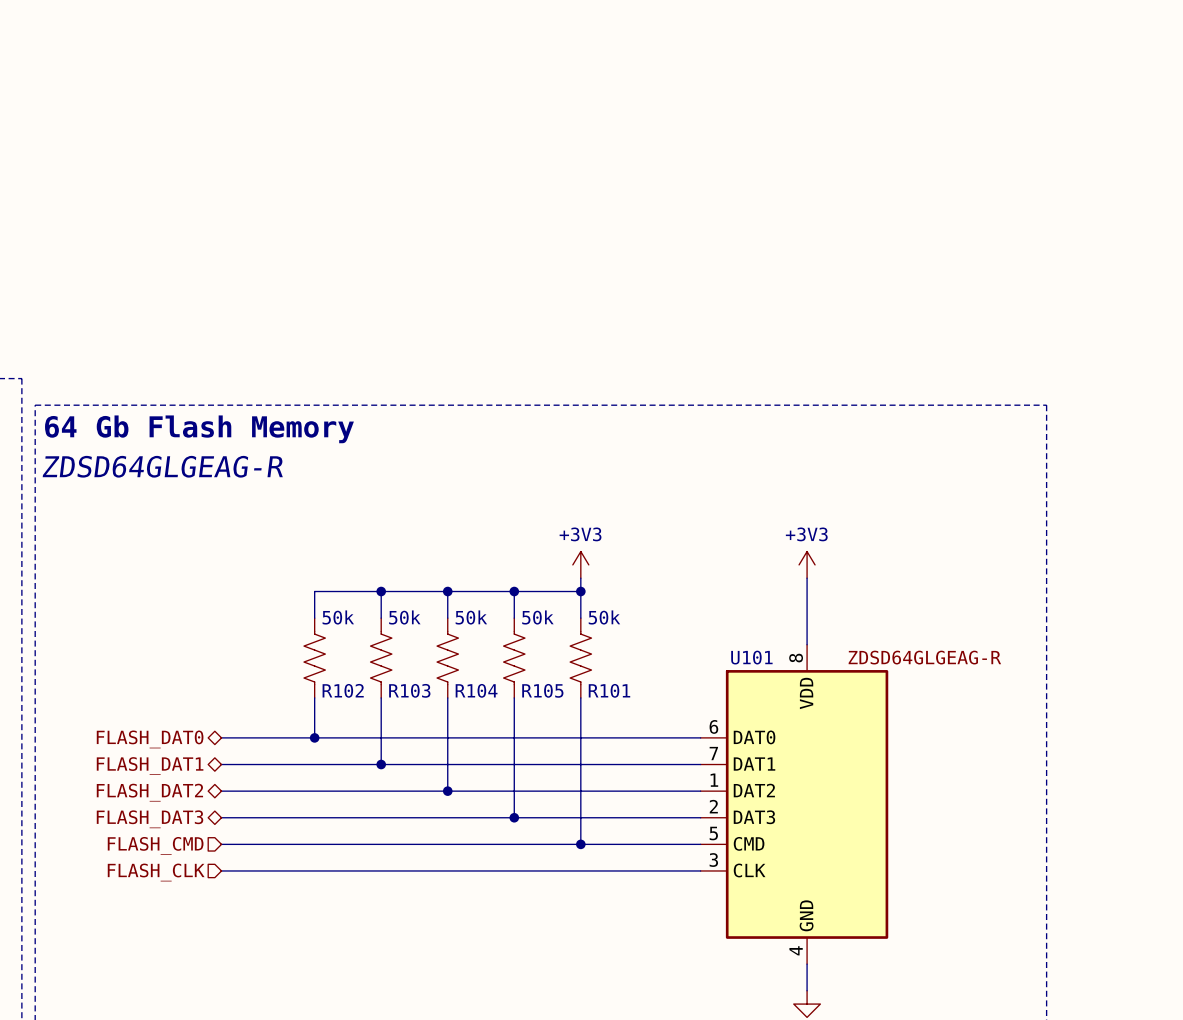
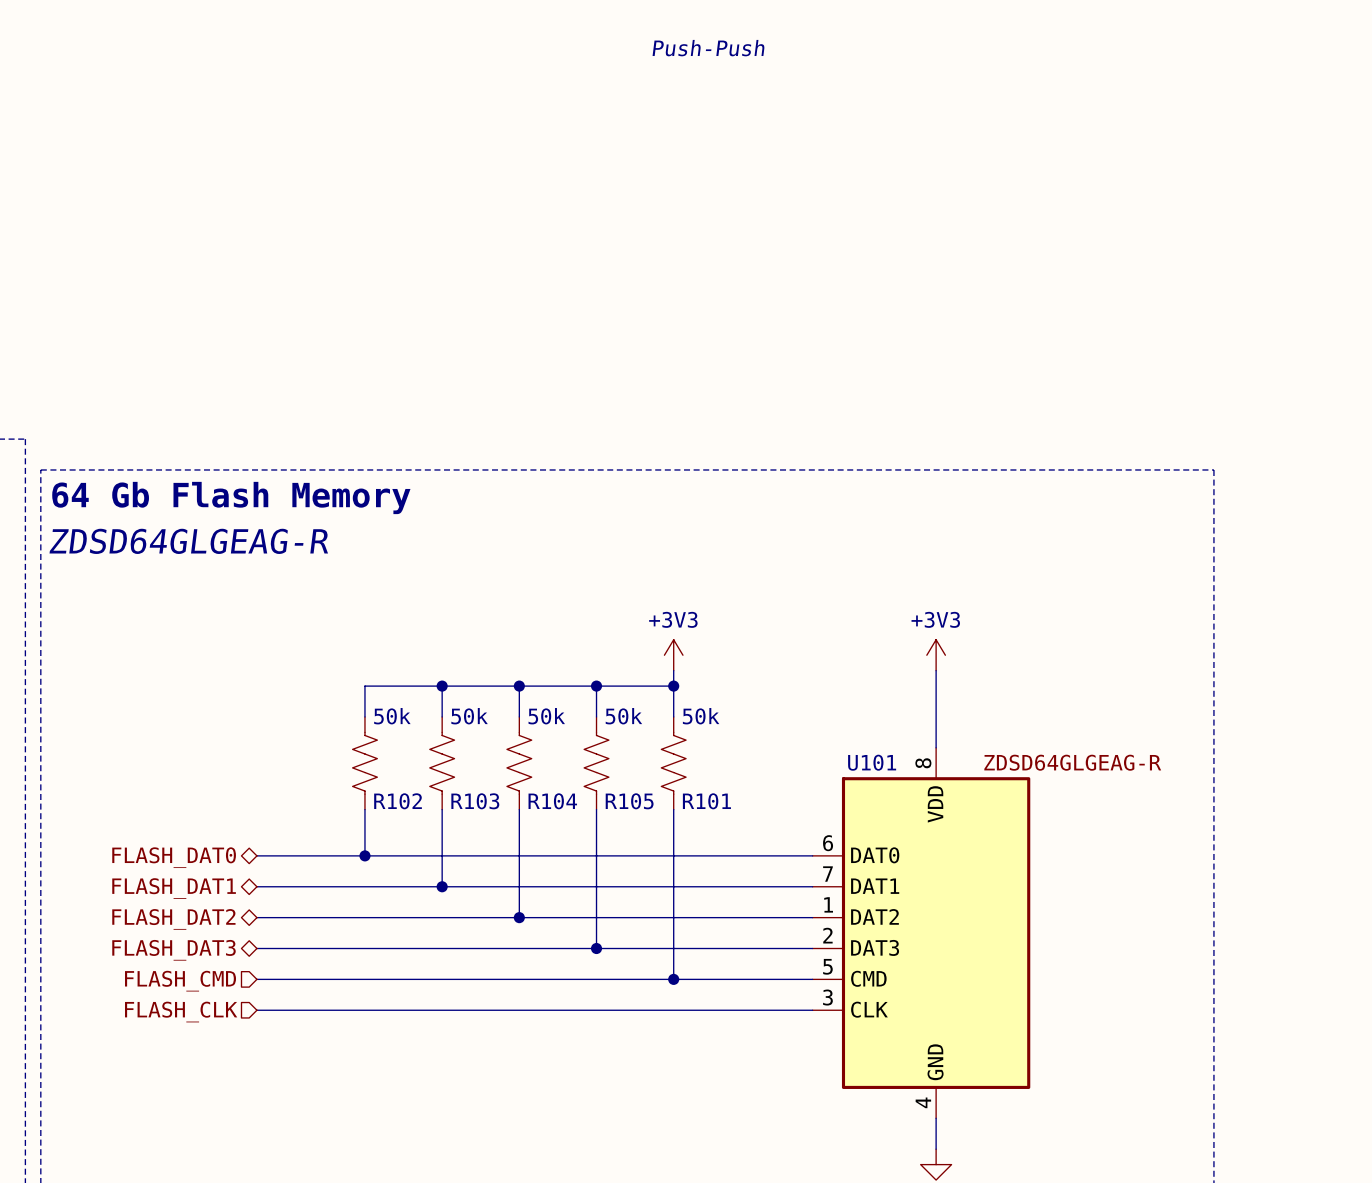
text: none -> Push-Push (708, 48)

